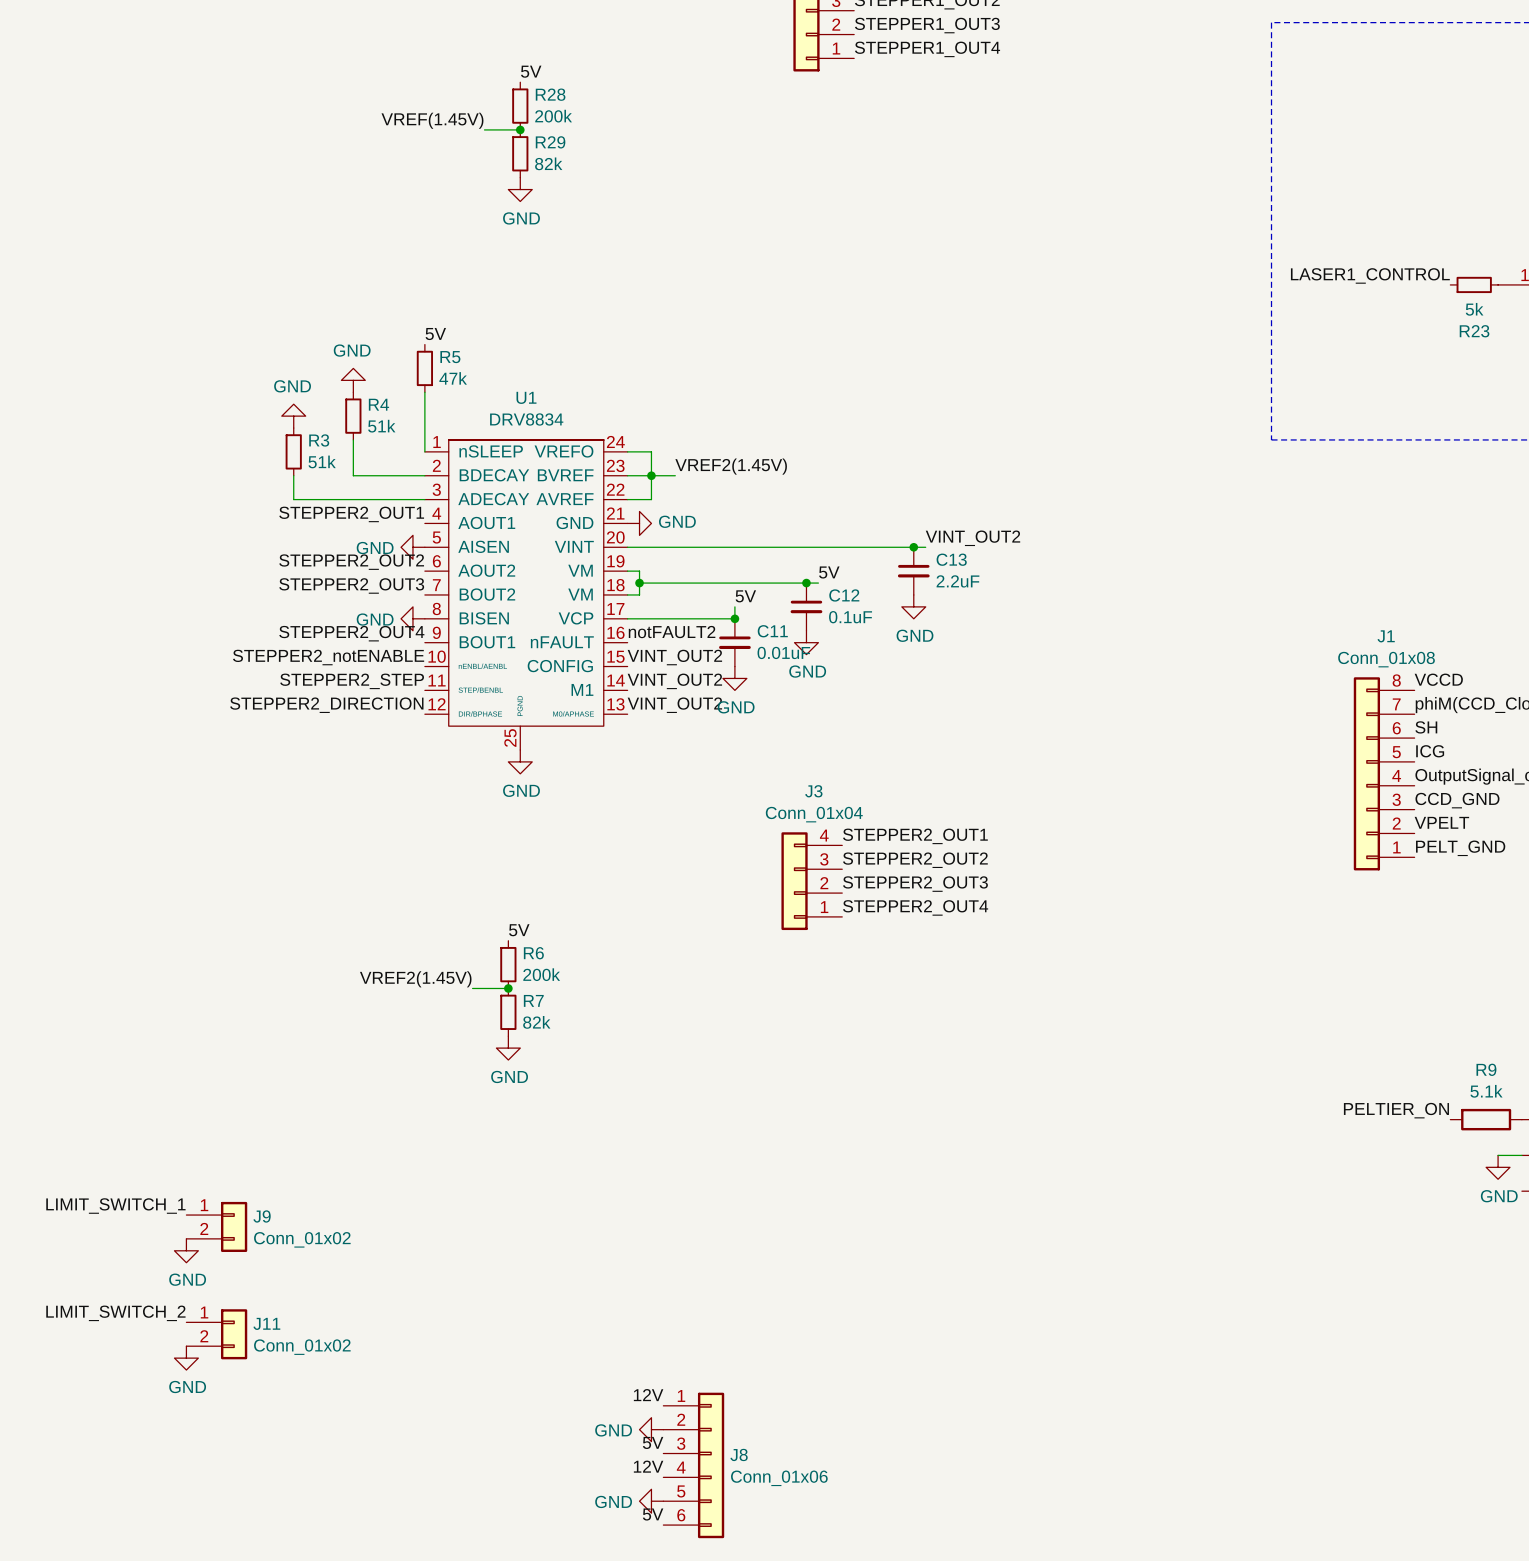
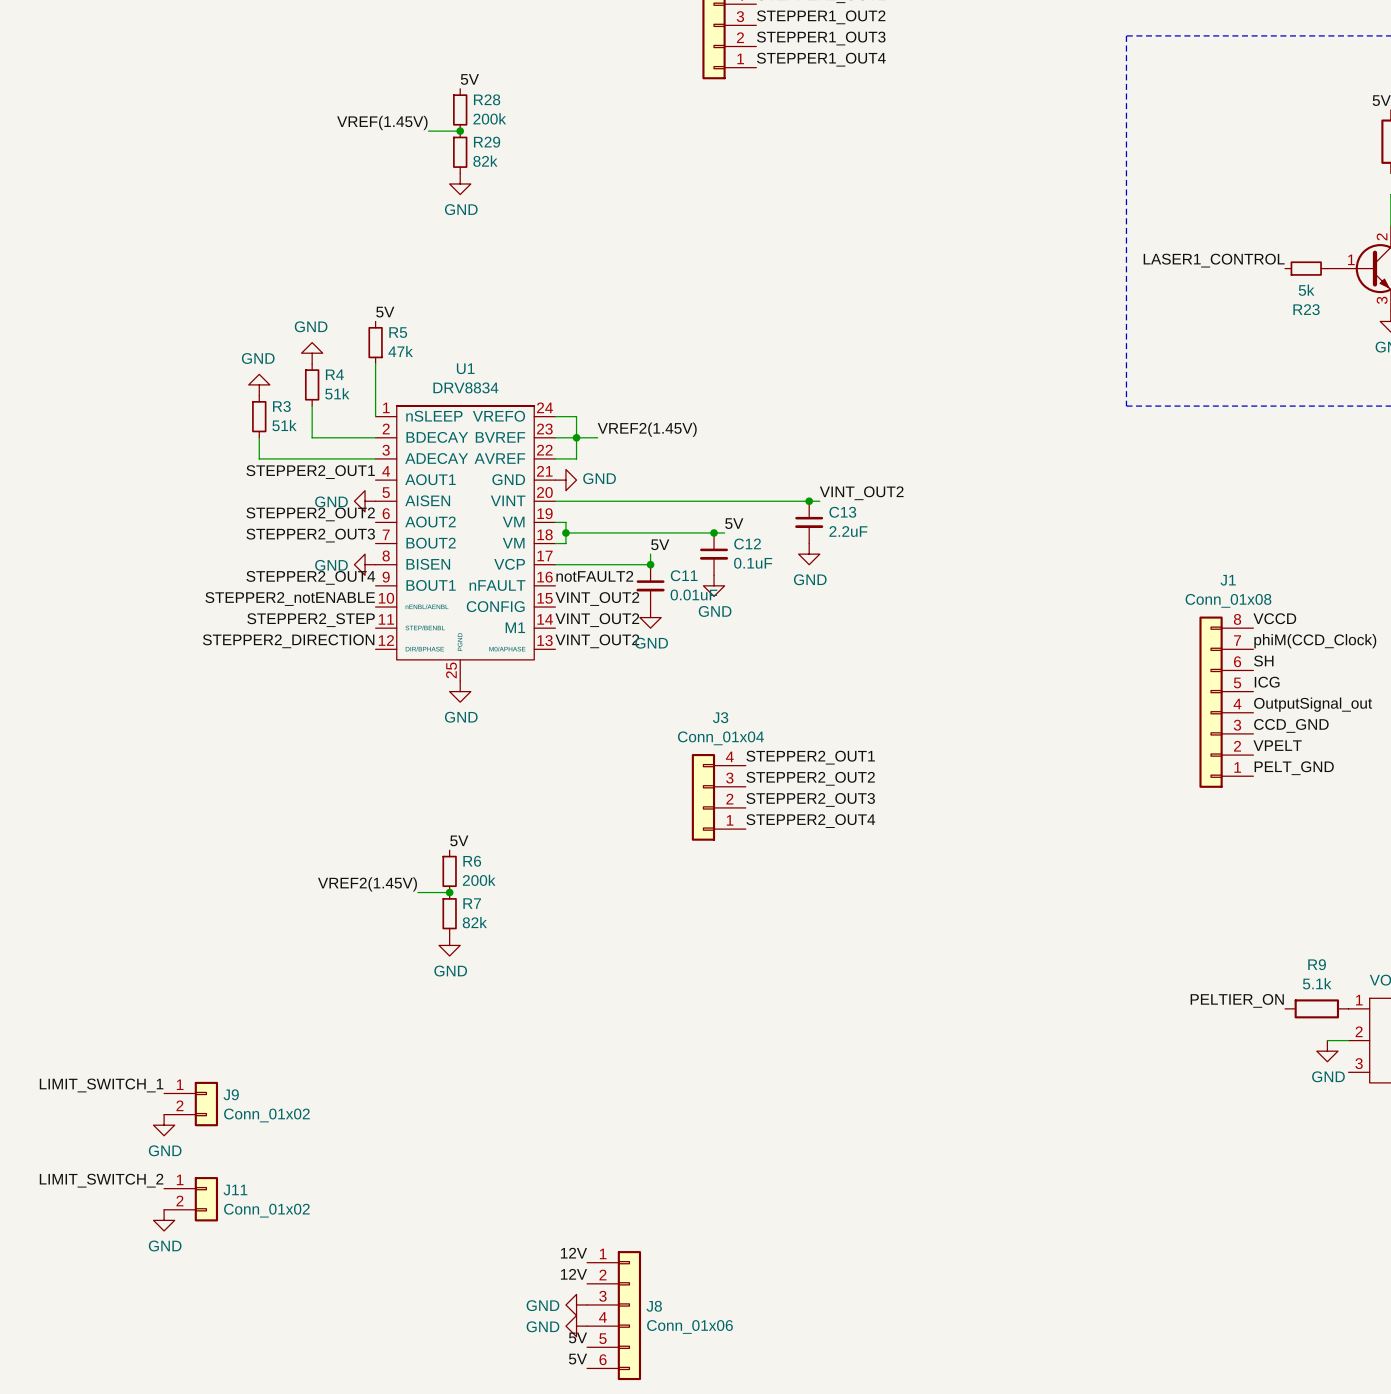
power symbol: GND (651, 1429) -> none
label position: 5V (653, 1442) -> 5V (577, 1337)
power symbol: none -> GND (576, 1304)
label position: 12V (648, 1466) -> 12V (573, 1274)
power symbol: none -> GND (576, 1326)
power symbol: GND (651, 1501) -> none

